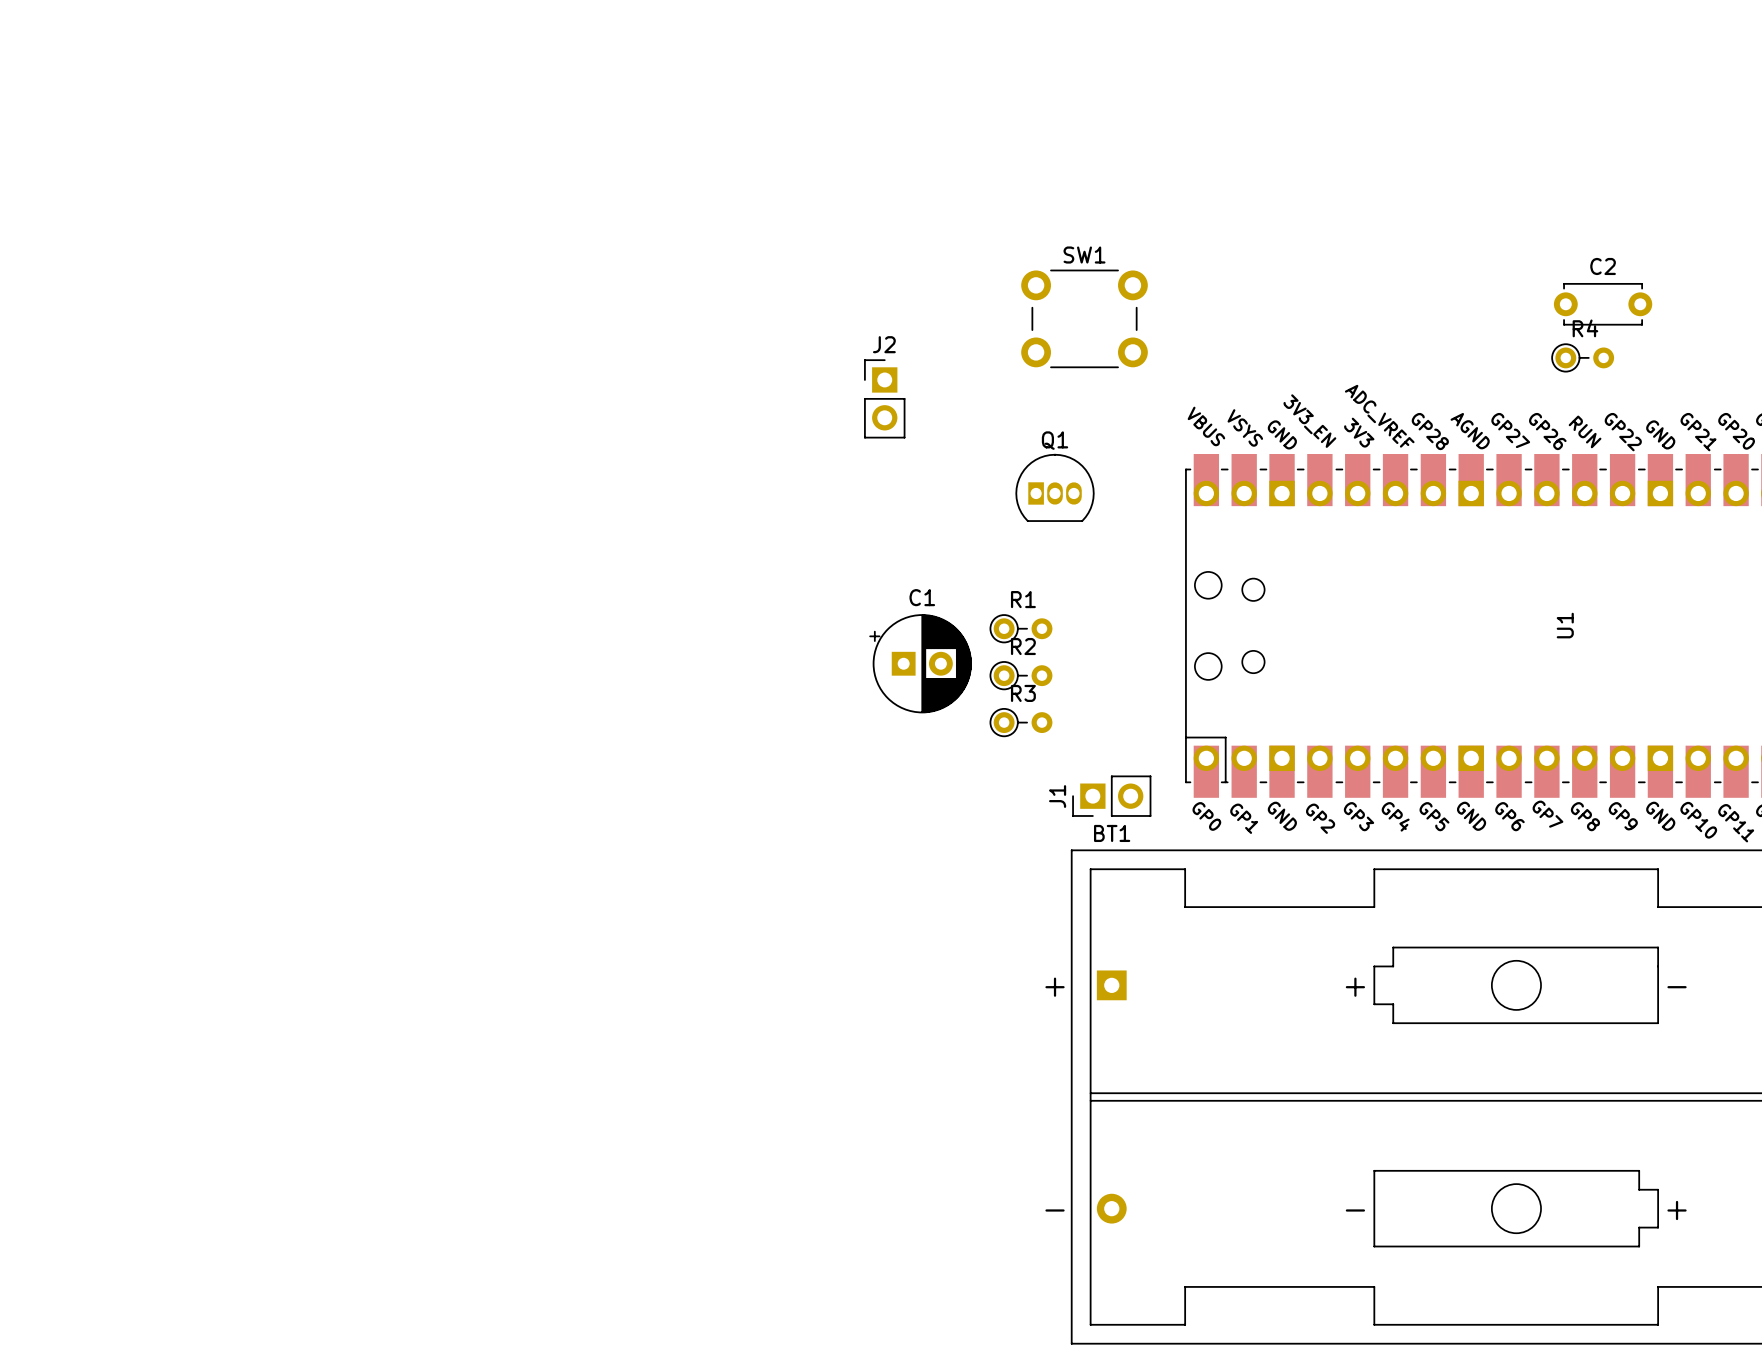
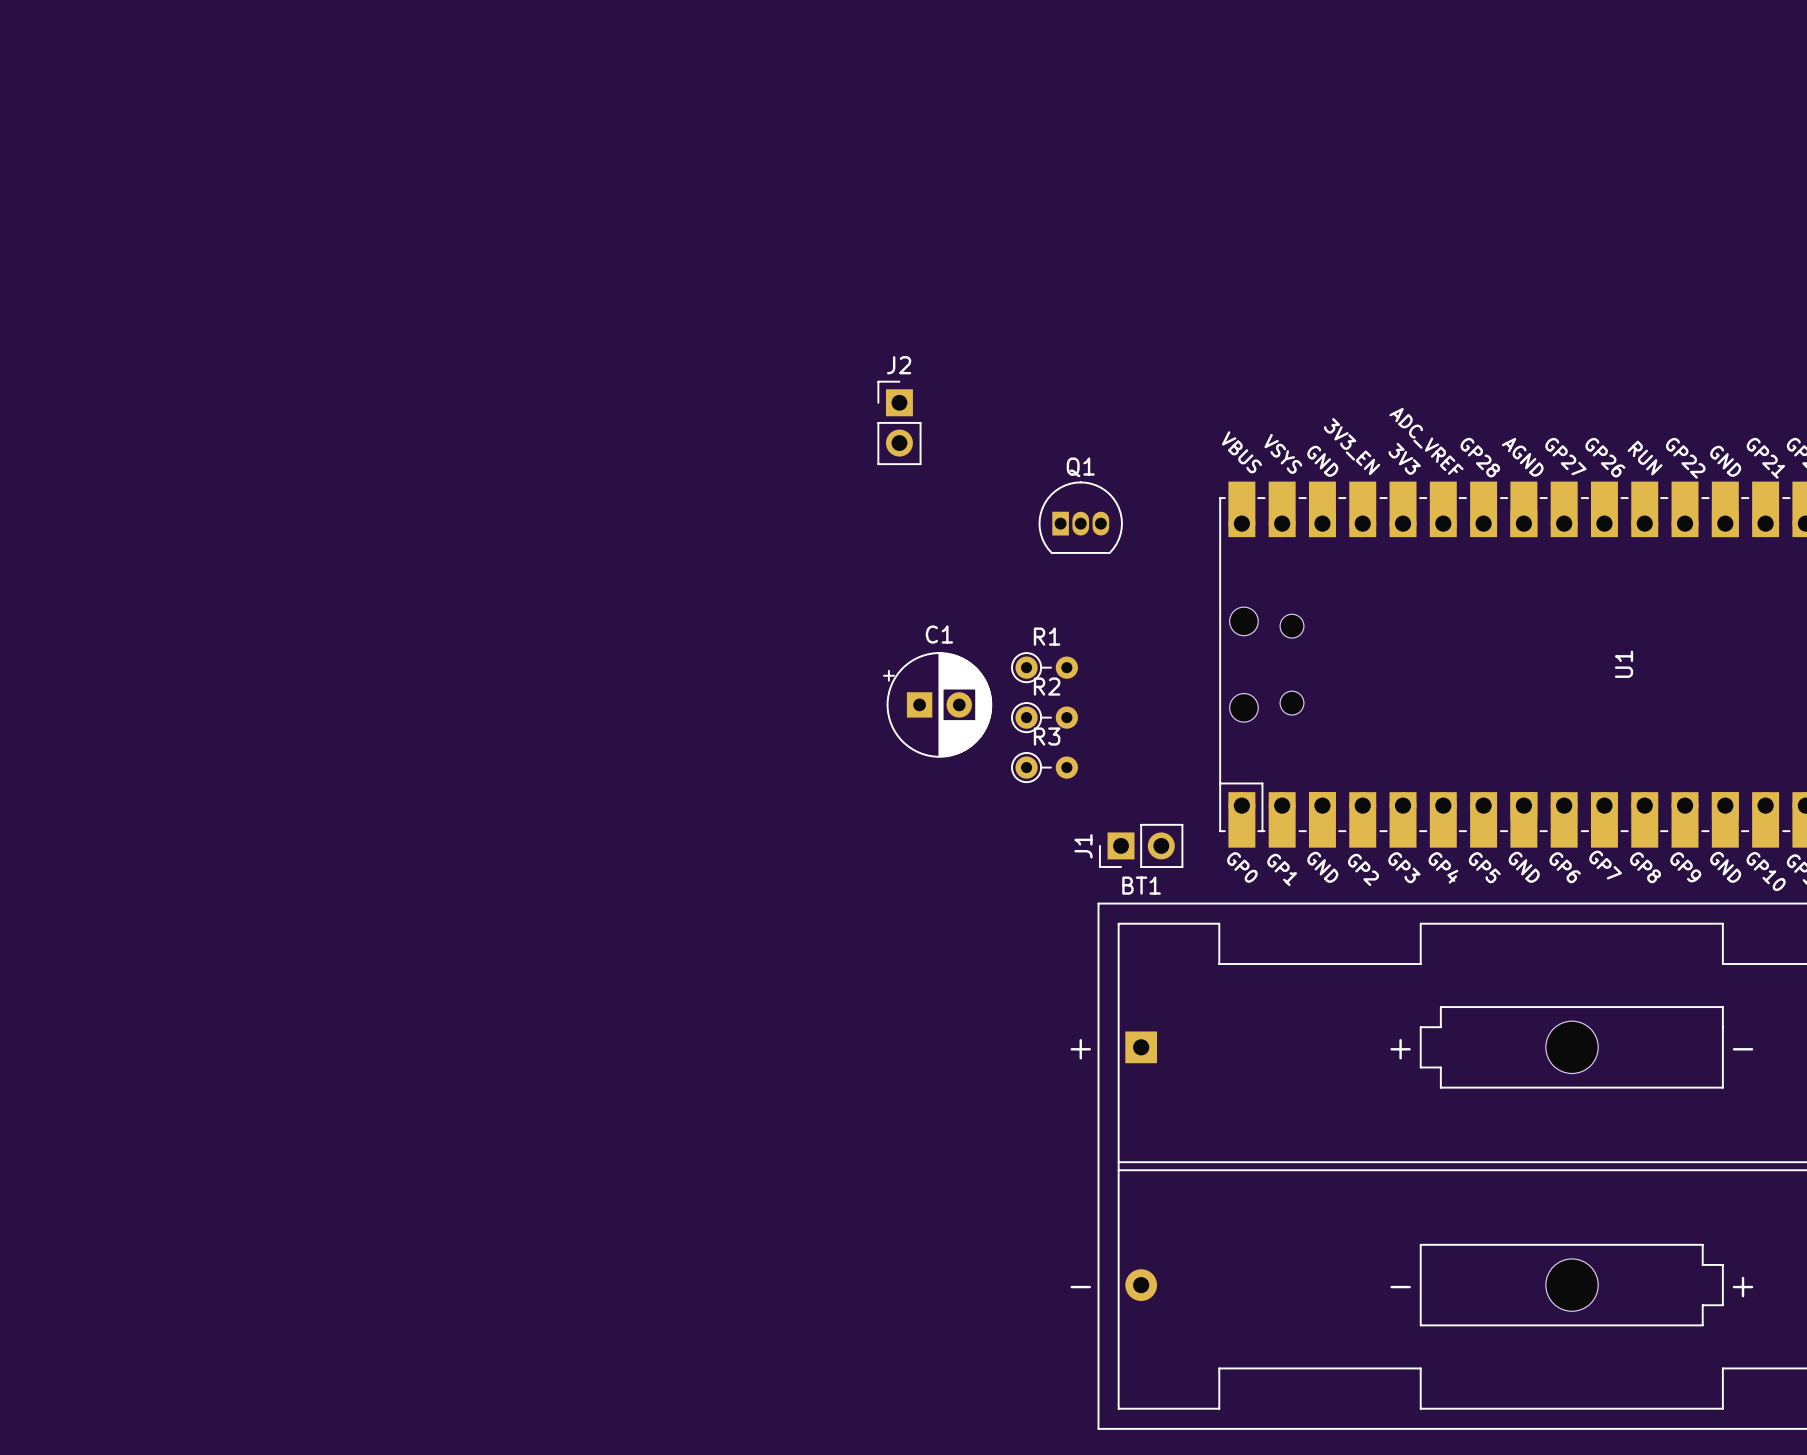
C2: (1603, 304) -> none
SW1: (1084, 318) -> none
R4: (1582, 357) -> none

